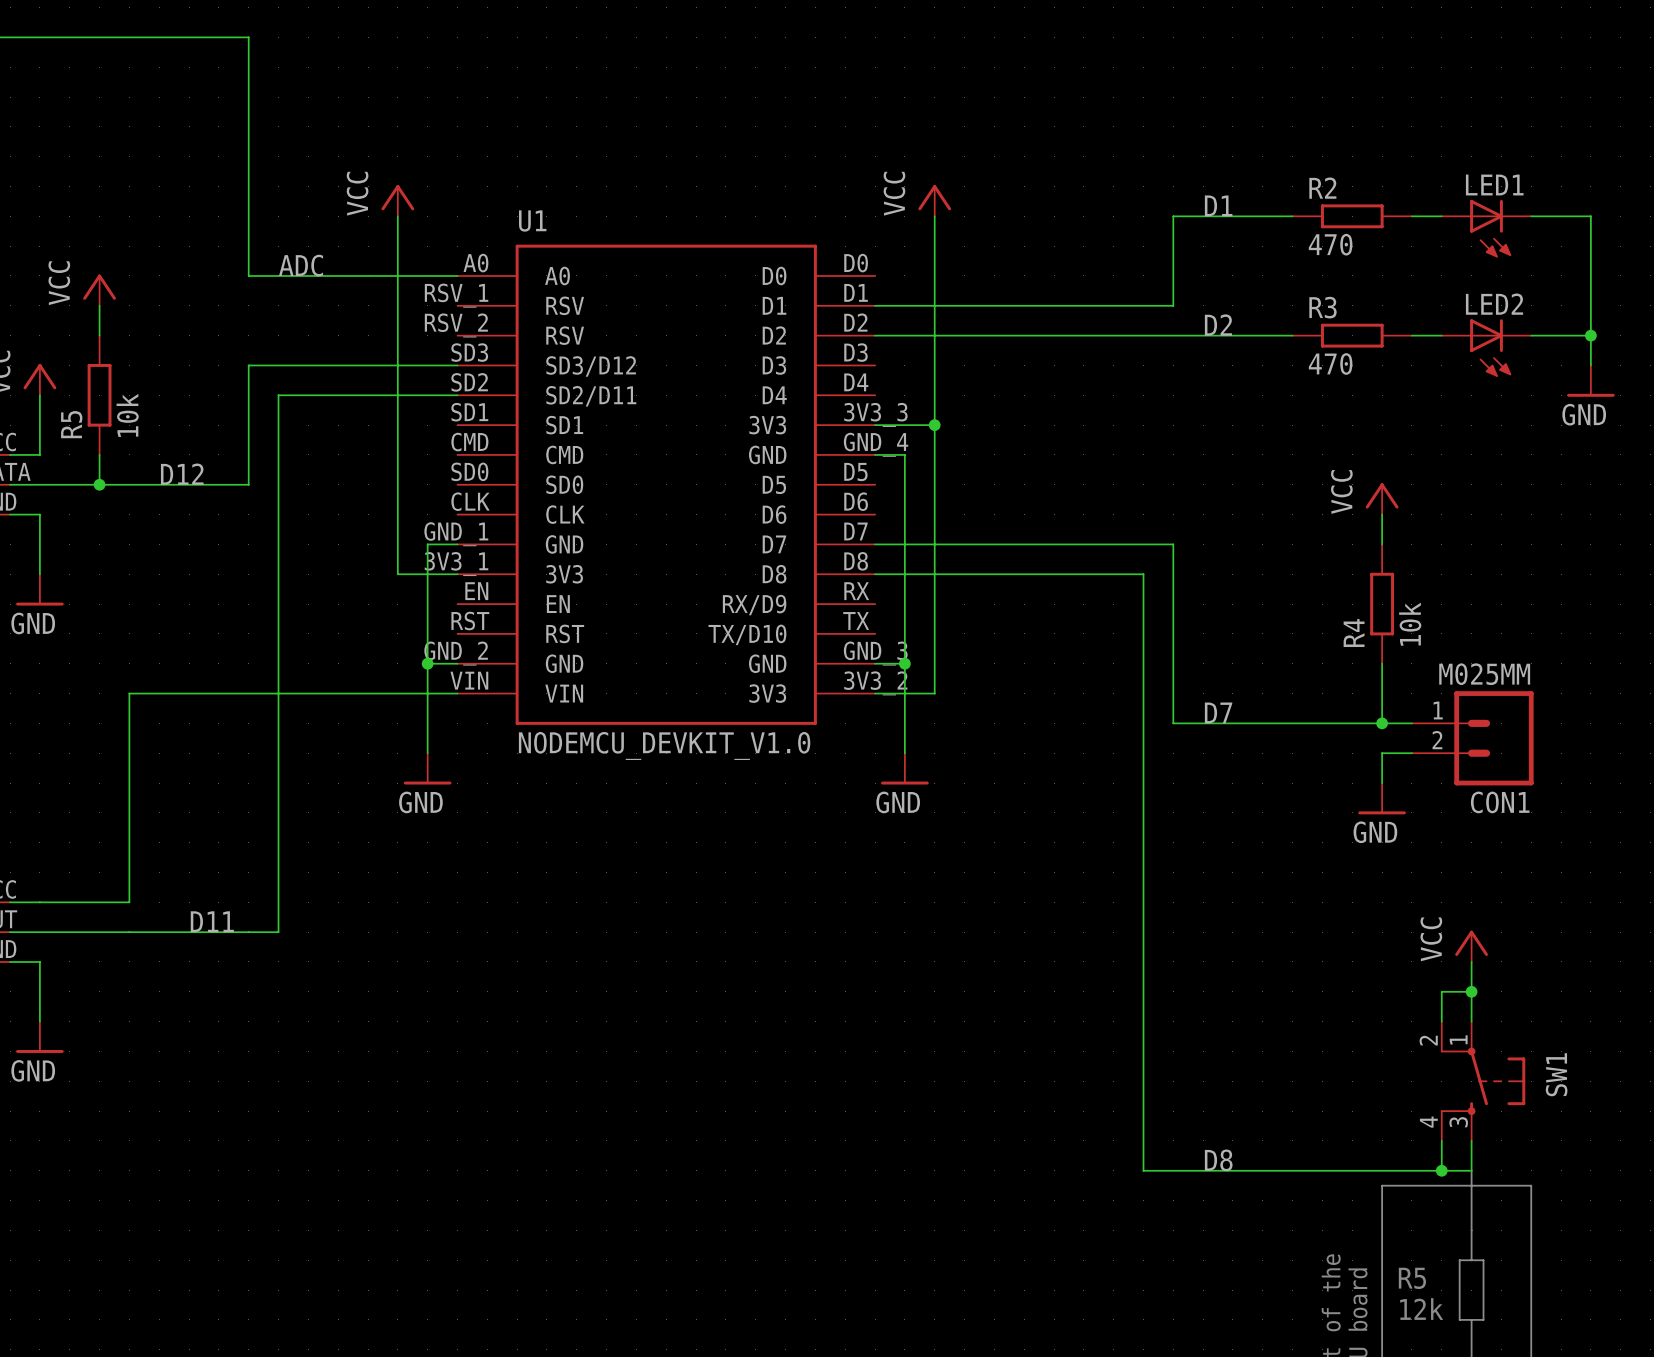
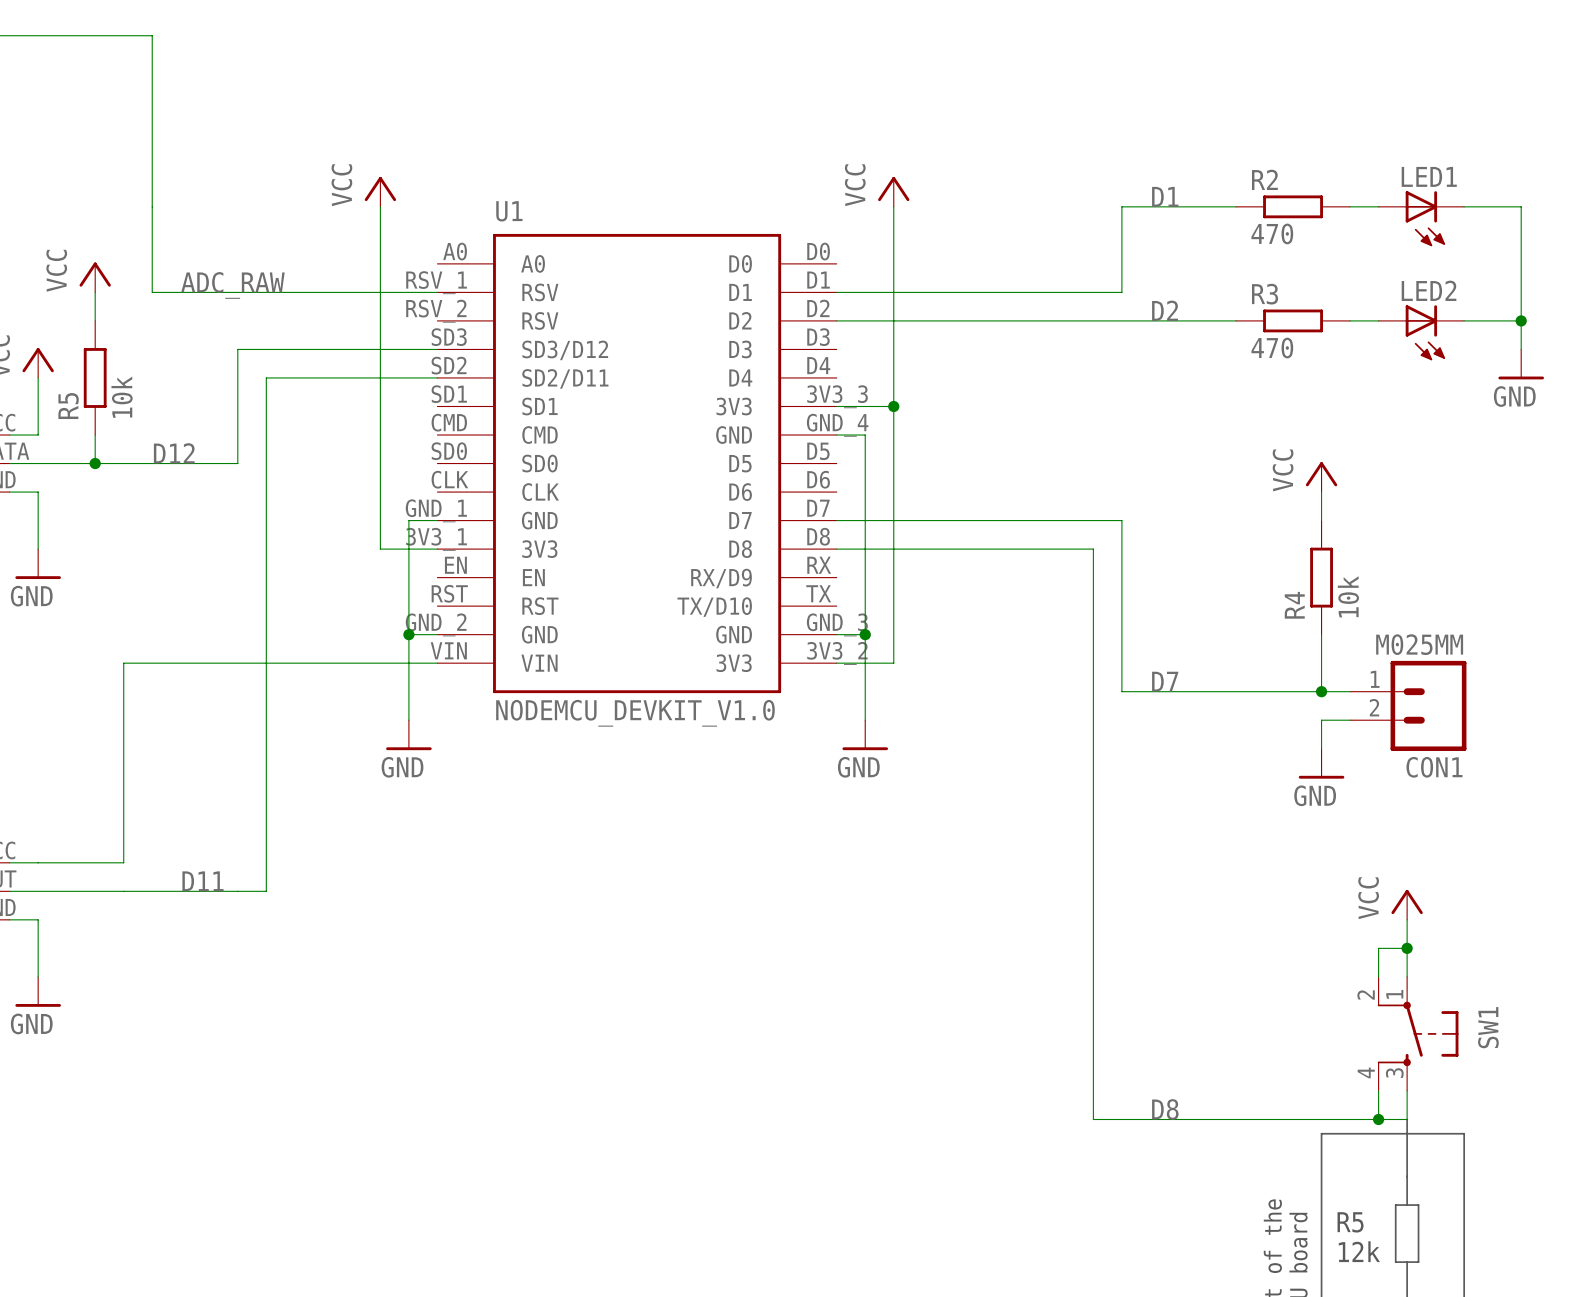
wire: (159, 37) (248, 37) (248, 275) (457, 275) -> (152, 35) (152, 292) (437, 292)
label: ADC (301, 265) -> none
label: none -> ADC_RAW (232, 285)

